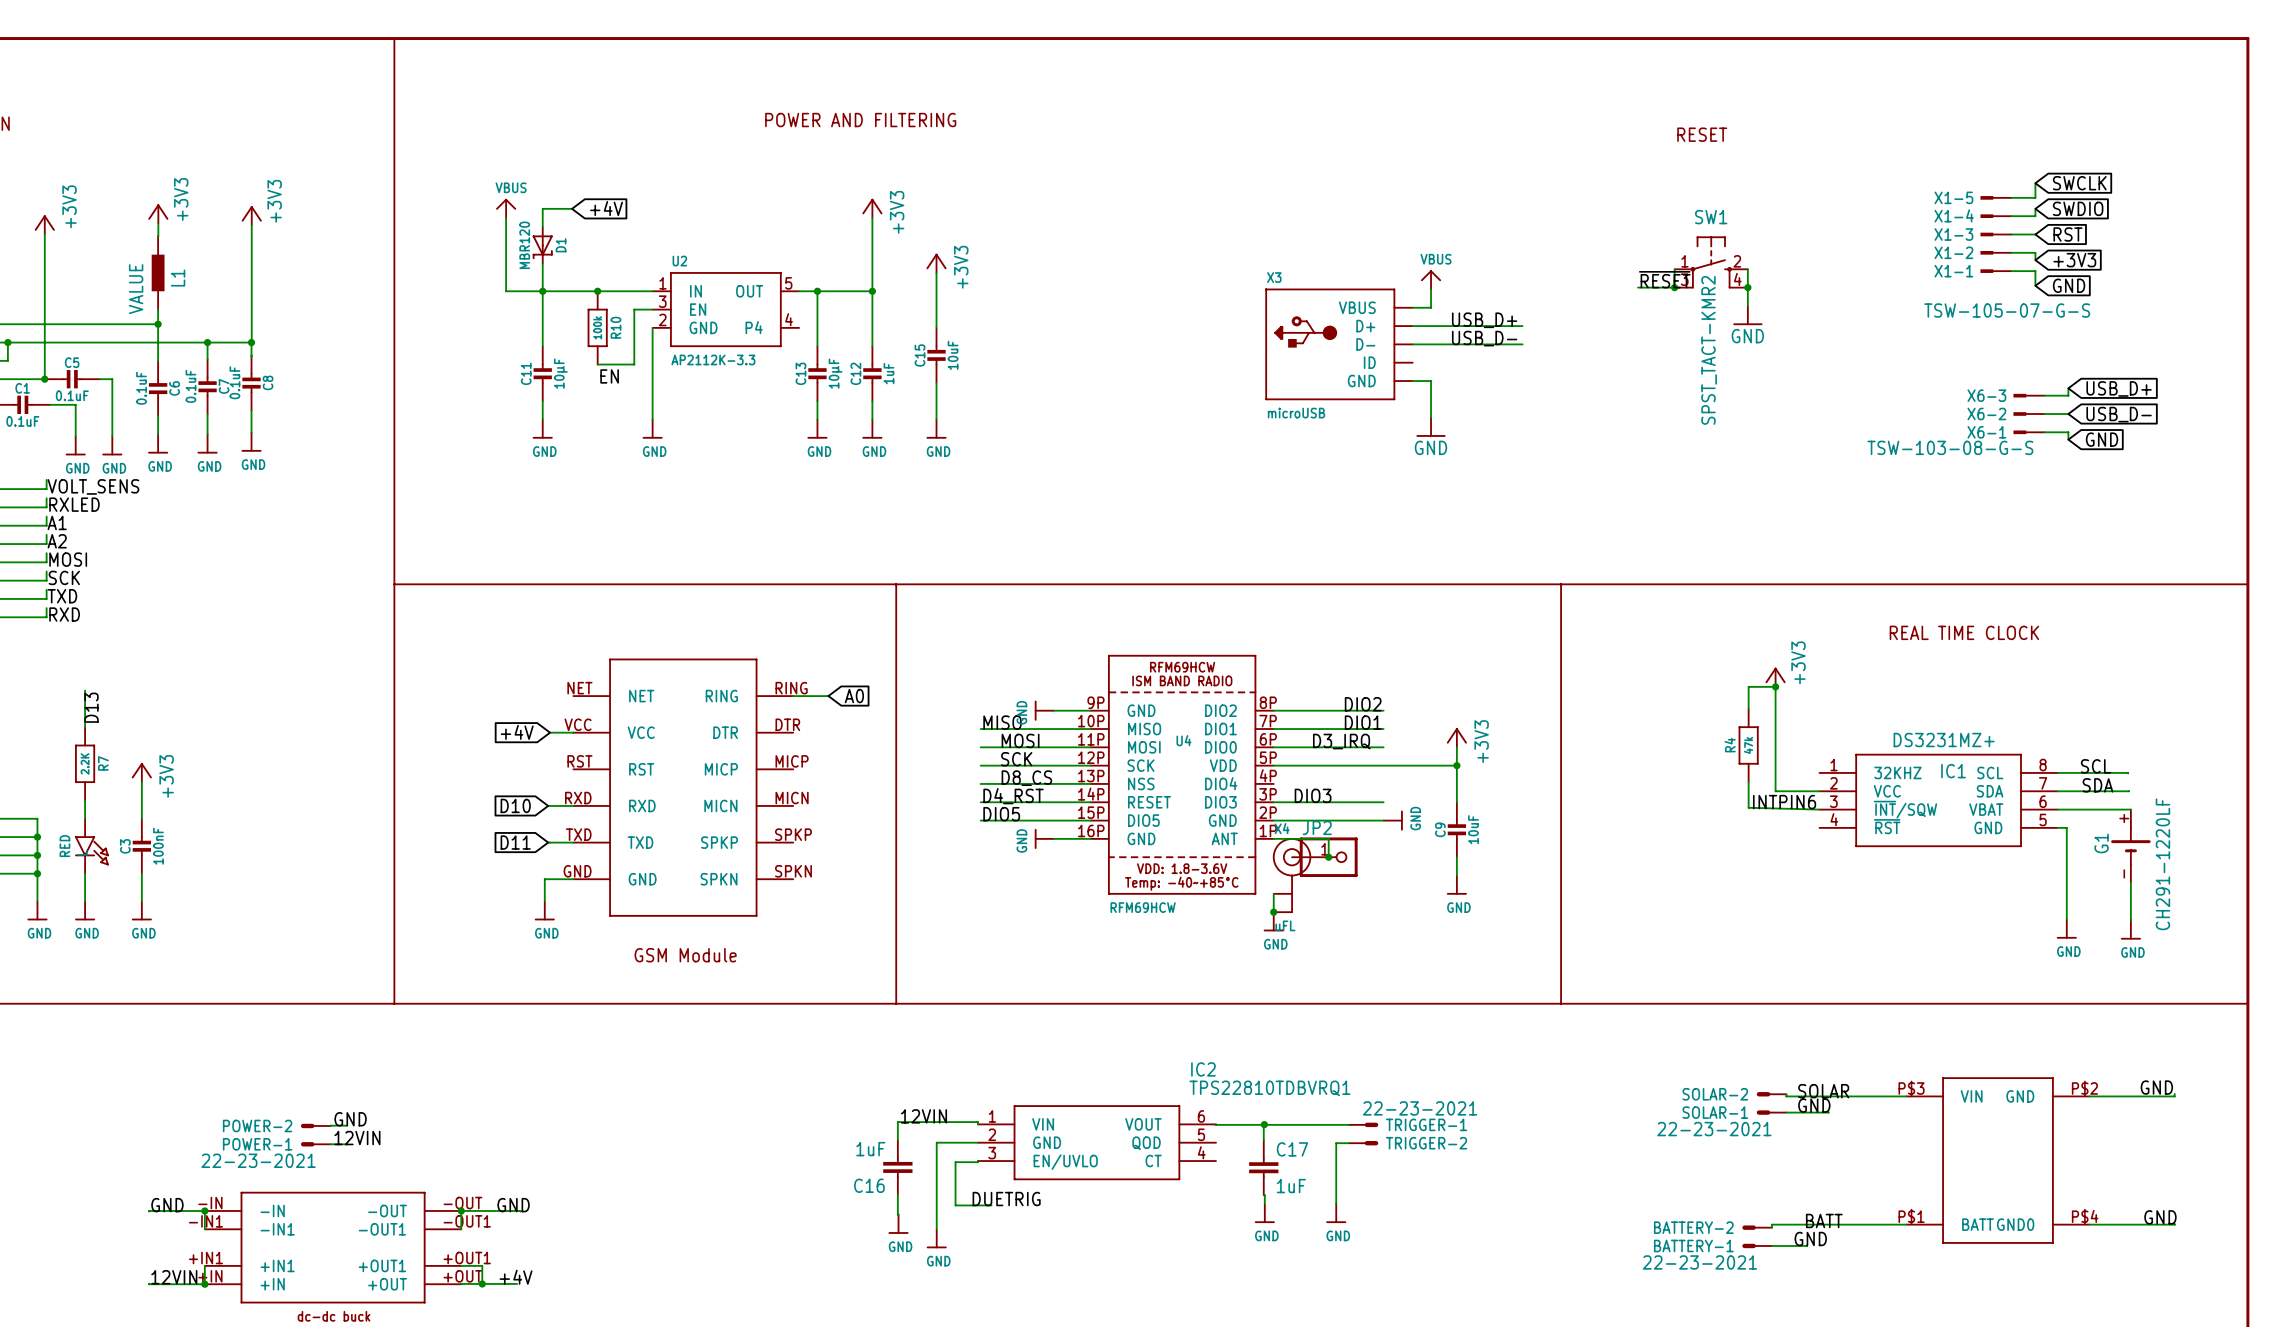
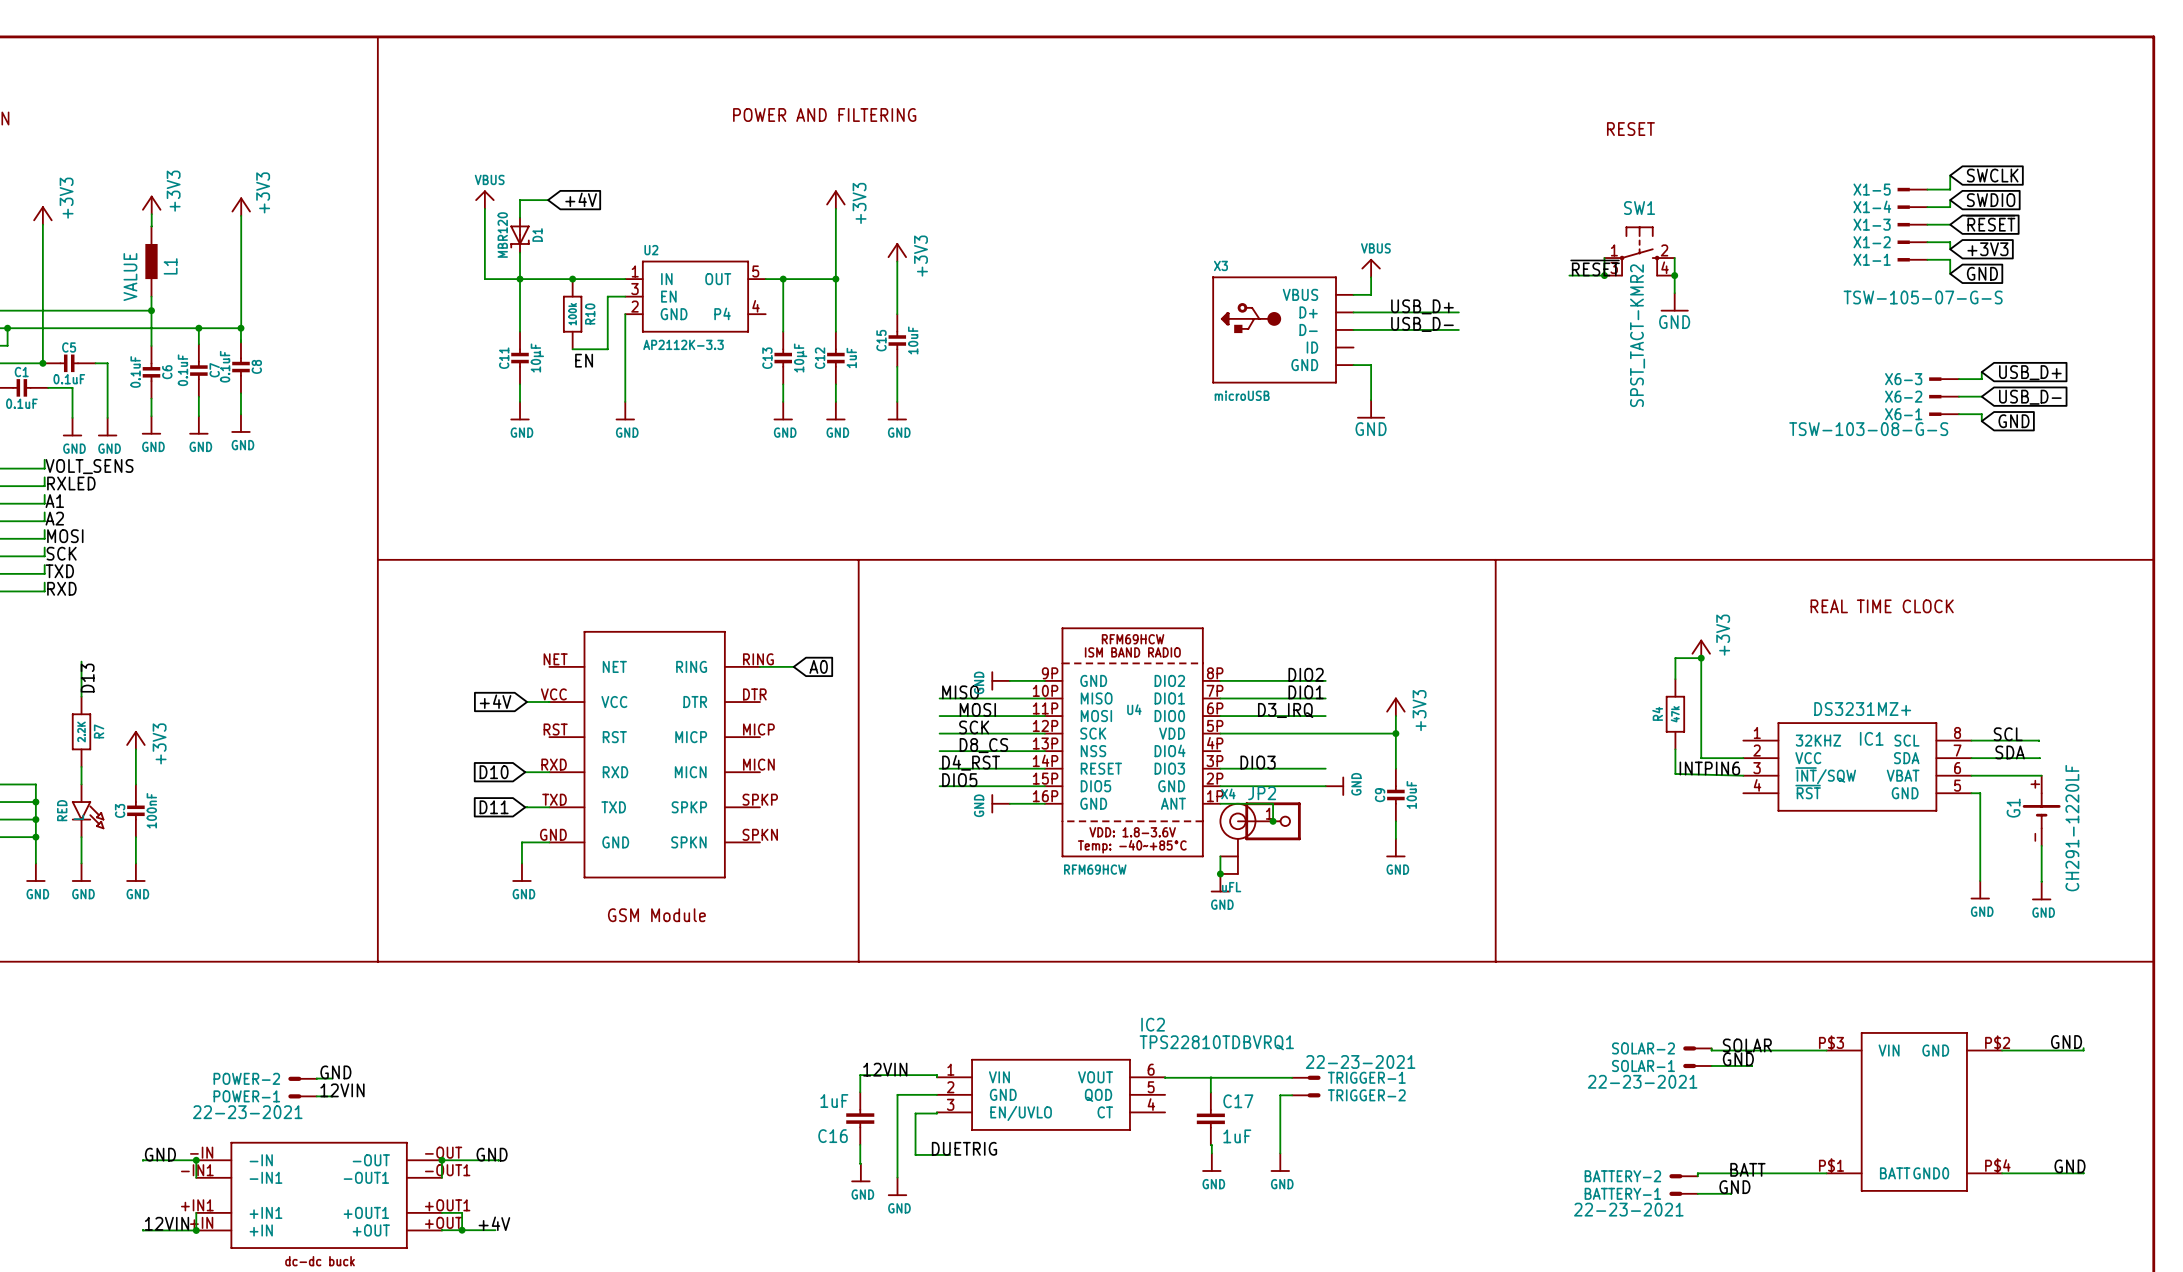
global label: RST (2067, 234) -> ~{RESET} (1990, 223)
junction: (1264, 1124) -> none

